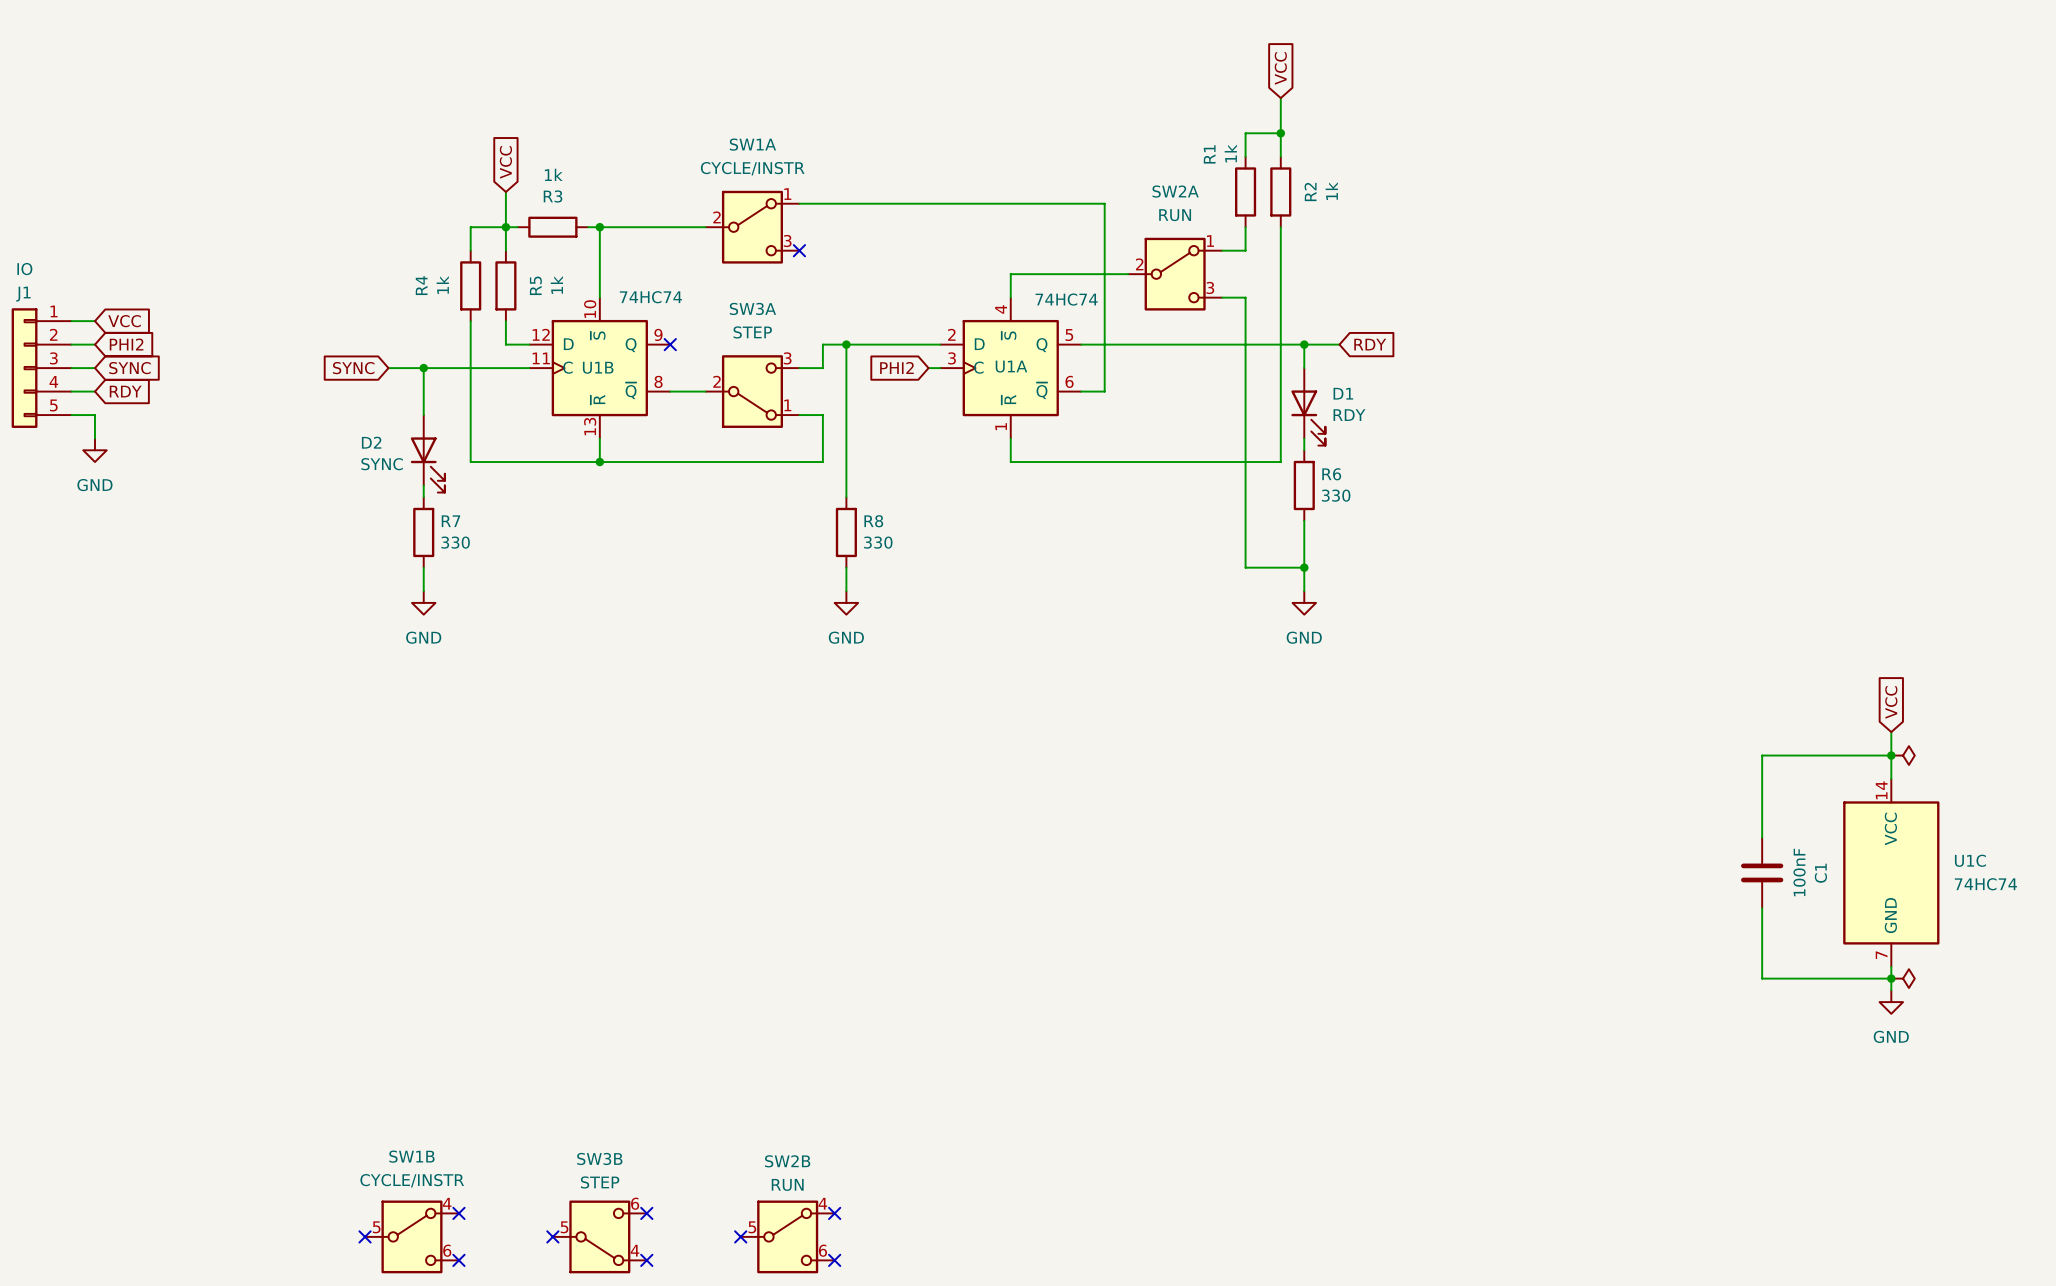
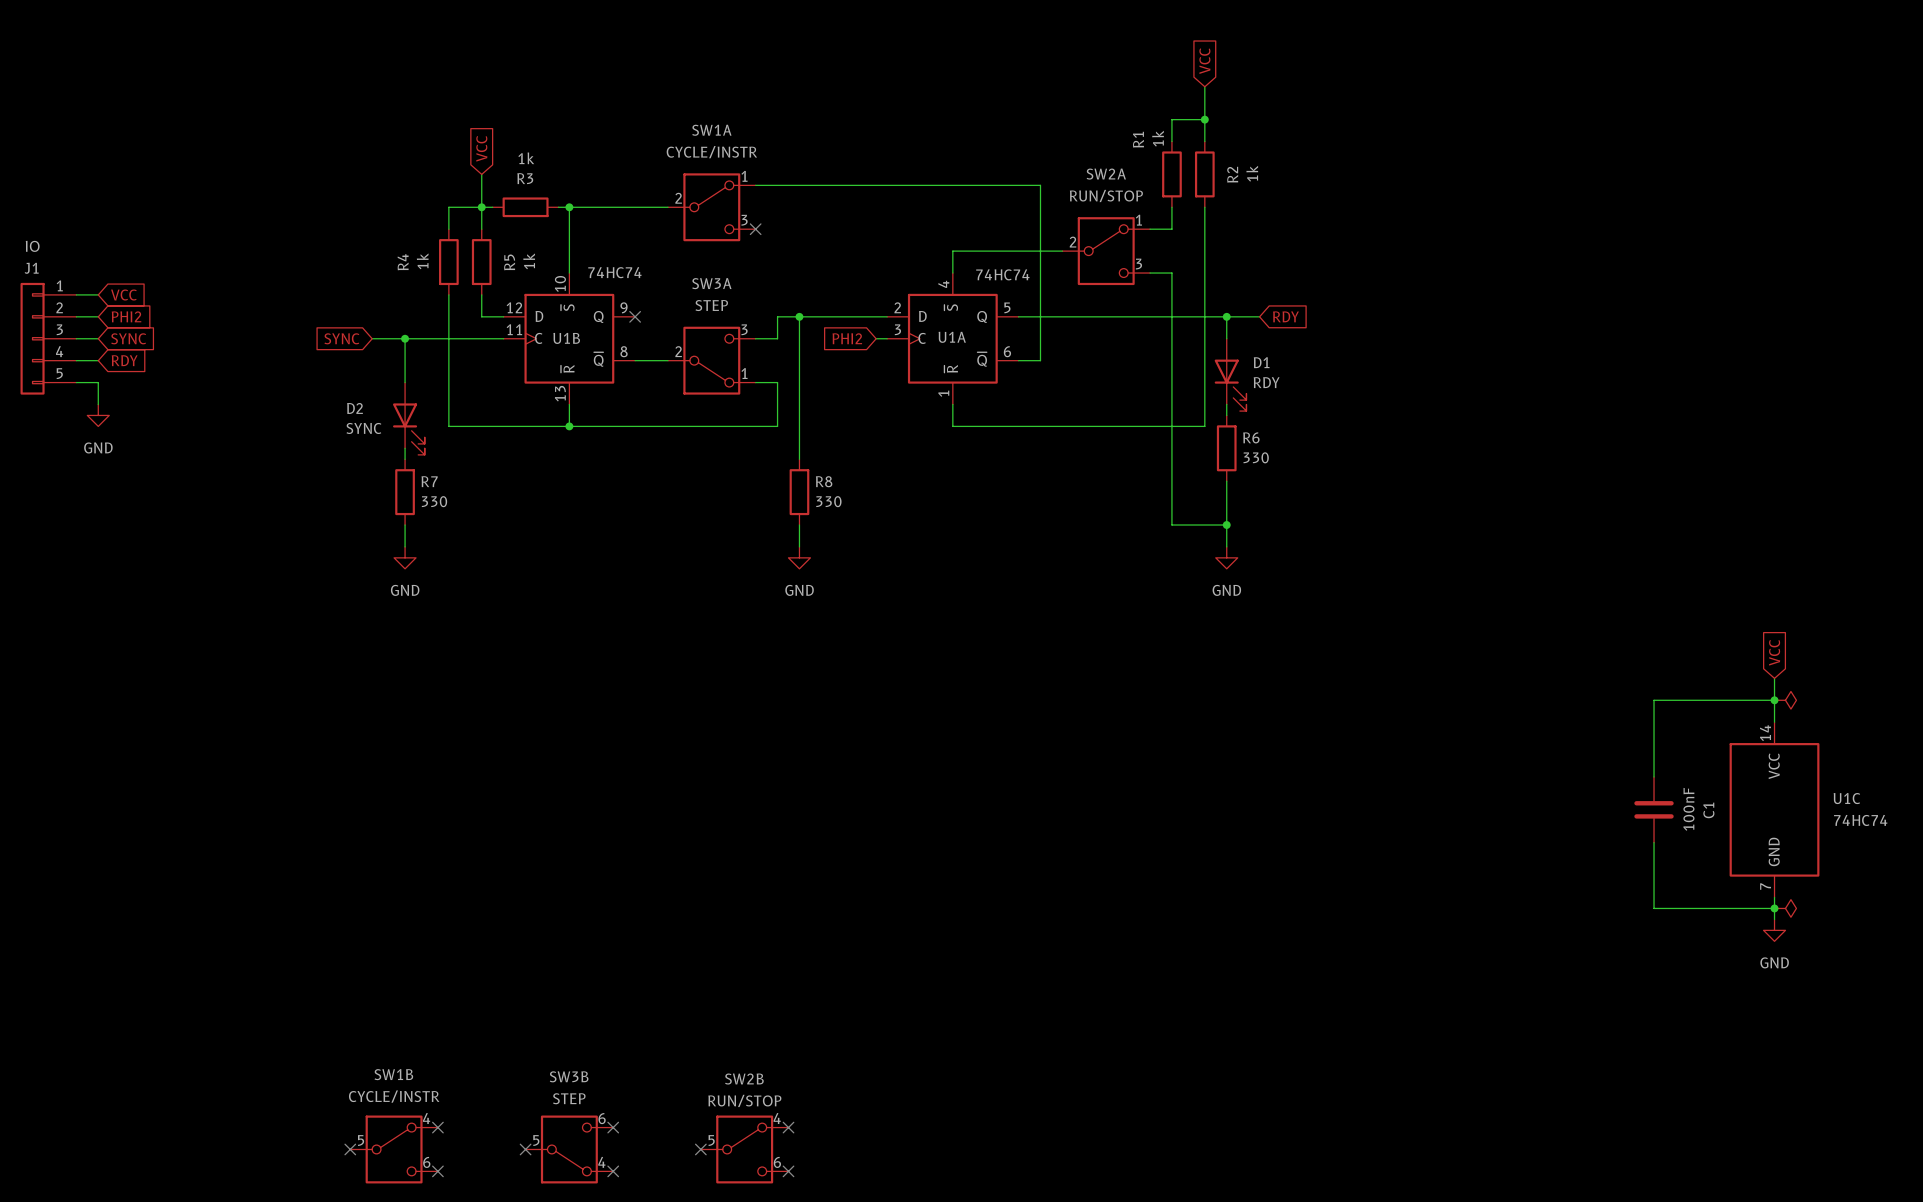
SW2A value: RUN (1175, 215) -> RUN/STOP (1106, 195)
SW2B value: RUN (787, 1184) -> RUN/STOP (744, 1100)

